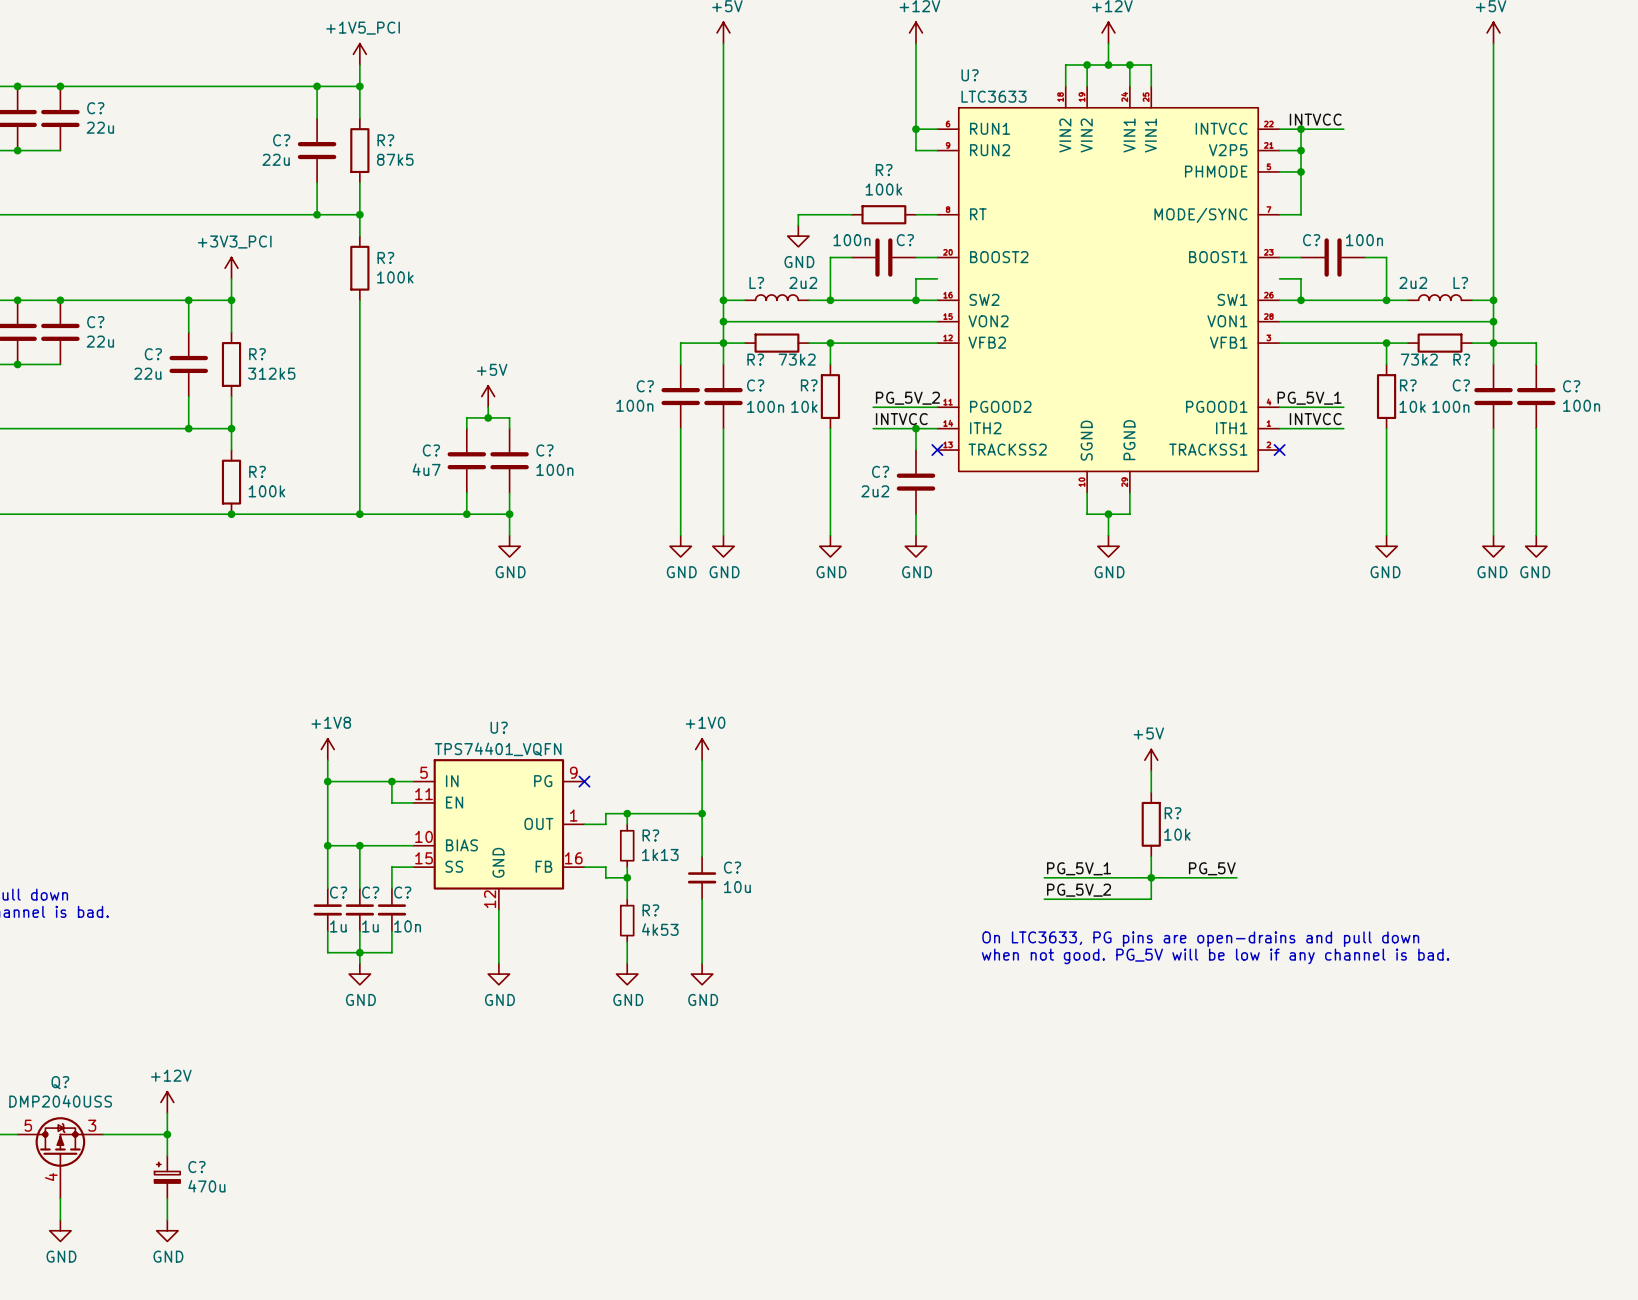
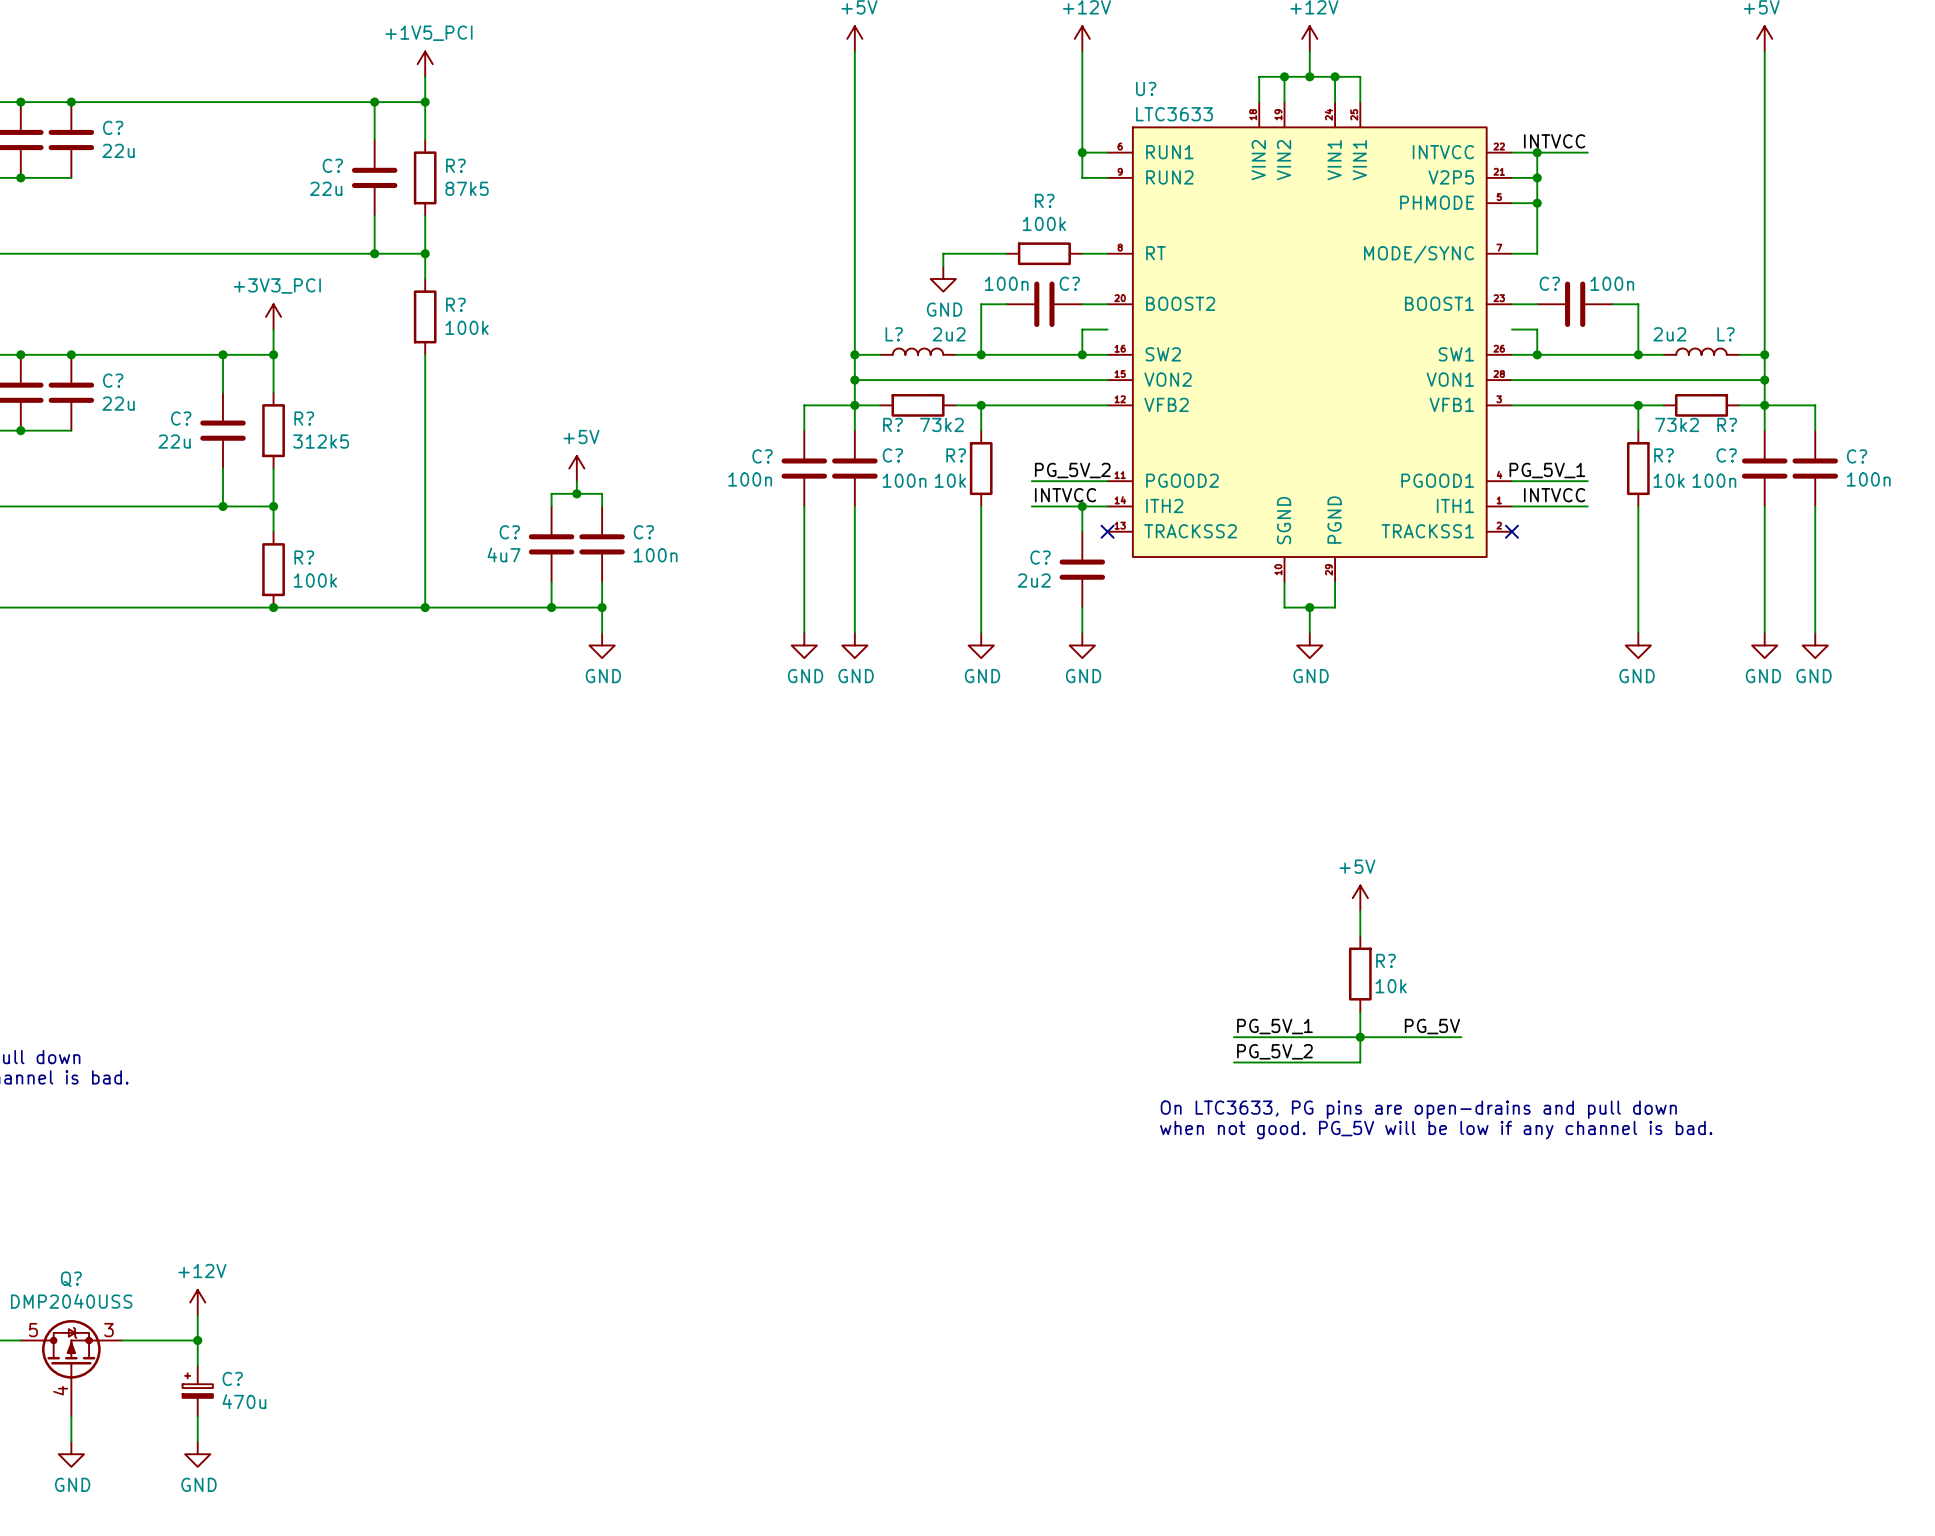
power symbol: +1V8 (327, 749) -> none
power symbol: +1V0 (702, 749) -> none
wire: (327, 760) (327, 888) -> none
wire: (702, 760) (702, 856) -> none
wire: (327, 781) (413, 781) -> none
junction: (327, 781) -> none
wire: (391, 781) (391, 802) (413, 802) -> none
junction: (391, 781) -> none
no-connect mark: (584, 781) -> none
wire: (627, 813) (627, 824) -> none
junction: (627, 813) -> none
wire: (702, 813) (605, 813) (605, 824) (584, 824) -> none
junction: (702, 813) -> none
U?: TPS74401_VQFN (498, 834) -> none
wire: (327, 845) (413, 845) -> none
junction: (327, 845) -> none
wire: (359, 845) (359, 888) -> none
junction: (359, 845) -> none
R?: 1k13 (627, 845) -> none
wire: (413, 867) (391, 867) (391, 888) -> none
wire: (584, 867) (605, 867) (605, 877) (627, 877) -> none
wire: (627, 867) (627, 899) -> none
junction: (627, 877) -> none
C?: 10u (702, 877) -> none
wire: (702, 899) (702, 963) -> none
C?: 1u (327, 909) -> none
C?: 1u (359, 909) -> none
C?: 10n (391, 909) -> none
wire: (498, 909) (498, 963) -> none
R?: 4k53 (627, 920) -> none
wire: (327, 931) (327, 952) (391, 952) (391, 931) -> none
wire: (359, 931) (359, 963) -> none
wire: (627, 941) (627, 963) -> none
junction: (359, 952) -> none
power symbol: GND (359, 974) -> none
power symbol: GND (498, 974) -> none
power symbol: GND (627, 974) -> none
power symbol: GND (702, 974) -> none

